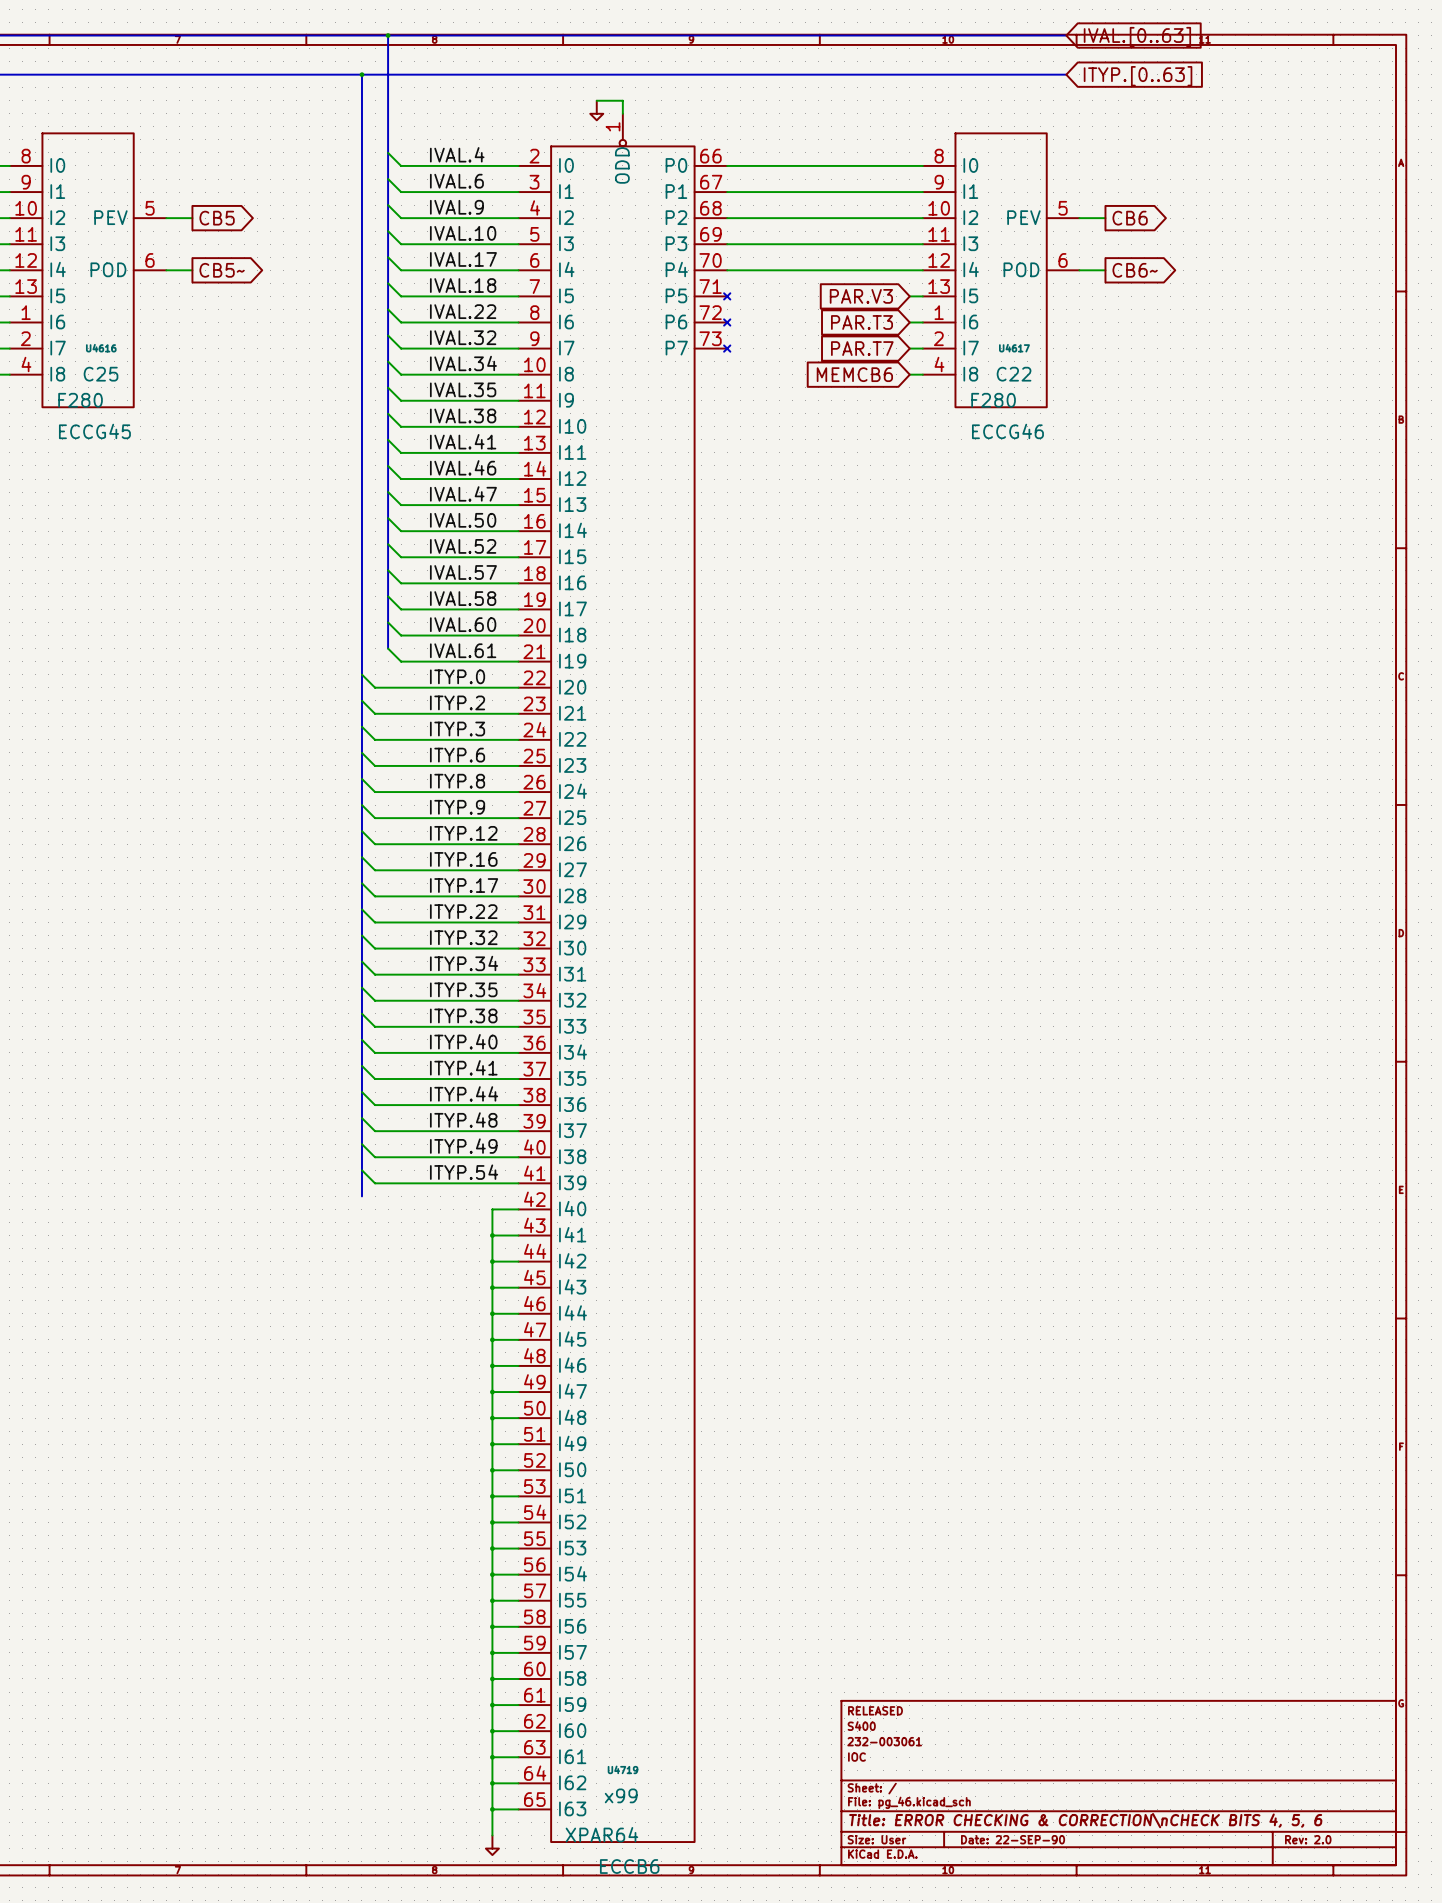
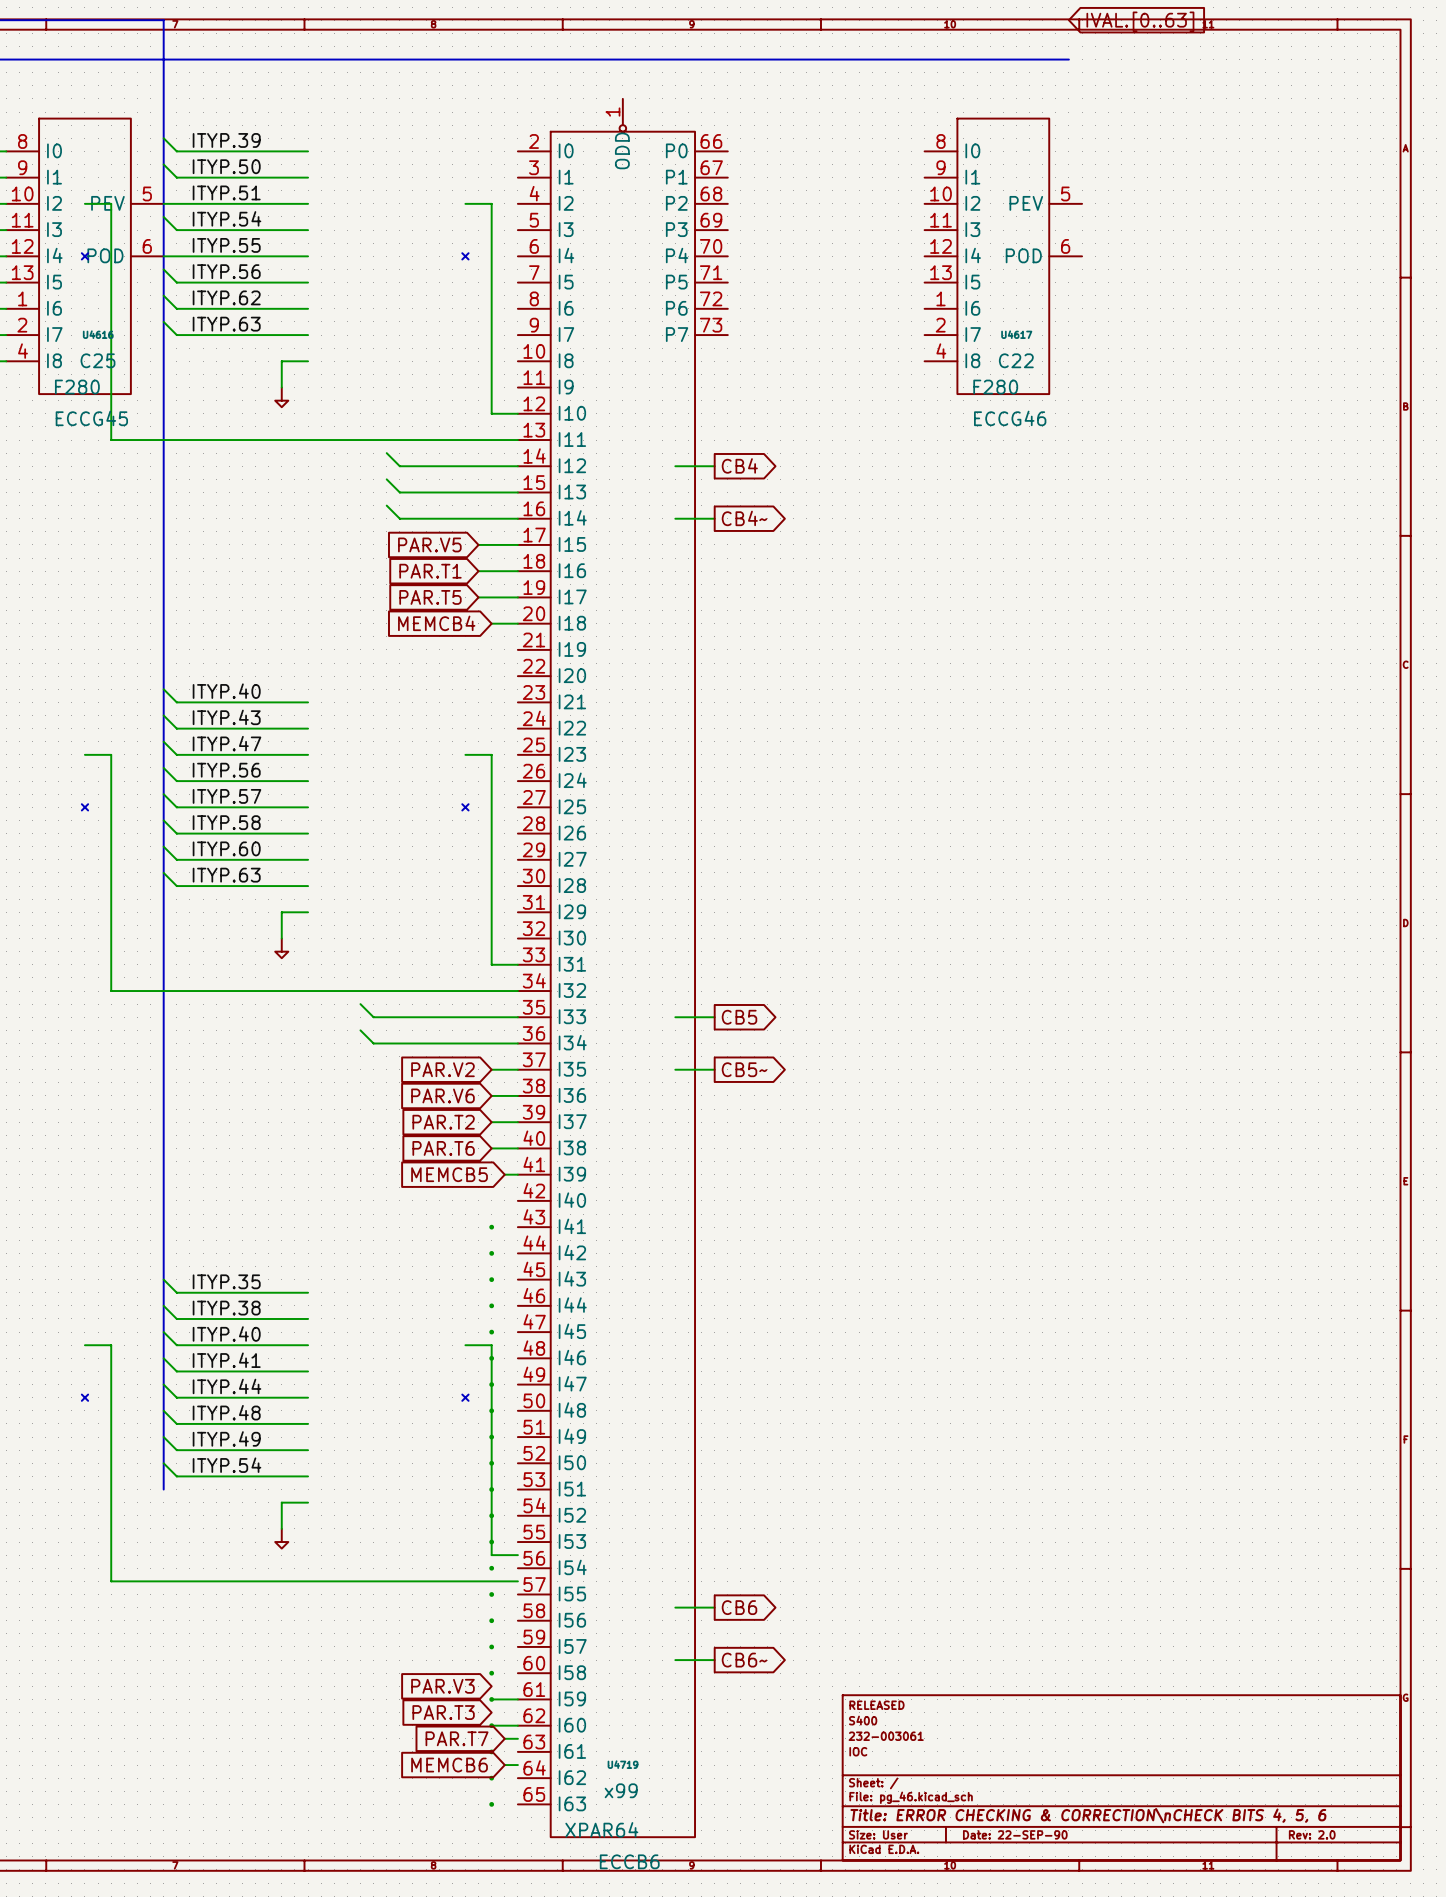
bus: (166, 35) (1066, 35) -> (163, 20) (163, 1489)
bus: (388, 35) (388, 648) -> none
junction: (388, 35) -> none
bus: (361, 74) (361, 1196) -> none
junction: (361, 74) -> none
global label: ITYP.[0..63] (1138, 76) -> none
wire: (596, 100) (622, 100) (622, 113) -> none
power symbol: (596, 110) -> none
wire: none -> (163, 138) (176, 151) (308, 151)
wire: (388, 152) (401, 165) (518, 165) -> none
label: IVAL.4 (457, 154) -> none
label: none -> ITYP.39 (226, 140)
wire: (727, 165) (922, 165) -> none
wire: none -> (163, 164) (176, 177) (308, 177)
wire: (388, 179) (401, 192) (518, 192) -> none
label: none -> ITYP.50 (226, 166)
label: IVAL.6 (456, 181) -> none
wire: (727, 192) (922, 192) -> none
wire: (388, 205) (401, 218) (466, 218) -> none
label: none -> ITYP.51 (226, 192)
label: IVAL.9 (456, 207) -> none
wire: none -> (189, 203) (308, 203)
global label: CB5 (217, 218) -> none
wire: (492, 218) (518, 218) -> (491, 203) (491, 413)
wire: (727, 218) (922, 218) -> none
wire: (1079, 218) (1105, 218) -> none
global label: CB6 (1130, 218) -> none
wire: none -> (163, 216) (176, 230) (308, 230)
wire: (388, 231) (401, 244) (518, 244) -> none
label: none -> ITYP.54 (226, 218)
label: IVAL.10 (463, 233) -> none
wire: (727, 244) (922, 244) -> none
wire: (388, 257) (401, 270) (518, 270) -> none
label: none -> ITYP.55 (226, 245)
label: IVAL.17 (463, 259) -> none
no-connect mark: none -> (84, 256)
wire: none -> (189, 256) (308, 256)
global label: CB5~ (222, 270) -> none
no-connect mark: none -> (465, 256)
wire: (727, 270) (922, 270) -> none
wire: (1079, 270) (1105, 270) -> none
global label: CB6~ (1135, 270) -> none
wire: none -> (163, 269) (176, 282) (308, 282)
wire: (388, 283) (401, 296) (518, 296) -> none
label: none -> ITYP.56 (226, 271)
label: IVAL.18 (463, 285) -> none
no-connect mark: (727, 296) -> none
global label: PAR.V3 (861, 296) -> none
wire: (909, 296) (922, 296) -> none
wire: none -> (163, 295) (176, 308) (308, 308)
wire: (388, 309) (401, 322) (518, 322) -> none
label: none -> ITYP.62 (226, 297)
label: IVAL.22 (463, 311) -> none
no-connect mark: (727, 322) -> none
global label: PAR.T3 (862, 322) -> none
wire: (909, 322) (922, 322) -> none
wire: none -> (163, 321) (176, 335) (308, 335)
wire: (388, 335) (401, 348) (518, 348) -> none
label: none -> ITYP.63 (226, 324)
label: IVAL.32 (463, 337) -> none
no-connect mark: (727, 348) -> none
global label: PAR.T7 (862, 348) -> none
wire: (909, 348) (922, 348) -> none
wire: (388, 361) (401, 374) (518, 374) -> none
label: IVAL.34 (463, 363) -> none
wire: none -> (308, 361) (281, 361) (281, 387)
global label: MEMCB6 (854, 374) -> none
wire: (909, 374) (922, 374) -> none
wire: (388, 387) (401, 400) (518, 400) -> none
label: IVAL.35 (463, 389) -> none
power symbol: none -> (281, 397)
wire: (388, 413) (401, 426) (492, 426) -> none
label: IVAL.38 (463, 415) -> none
wire: (388, 439) (401, 452) -> (84, 203) (111, 203) (111, 440) (399, 440)
label: IVAL.41 (463, 441) -> none
label: IVAL.46 (463, 467) -> none
global label: none -> CB4 (739, 465)
wire: none -> (675, 466) (714, 466)
label: IVAL.47 (463, 493) -> none
label: IVAL.50 (463, 520) -> none
global label: none -> CB4~ (744, 518)
wire: none -> (675, 518) (714, 518)
wire: (388, 544) (401, 557) (479, 557) -> none
label: IVAL.52 (463, 546) -> none
global label: none -> PAR.V5 (429, 544)
wire: (388, 570) (401, 583) (479, 583) -> none
label: IVAL.57 (463, 572) -> none
global label: none -> PAR.T1 (430, 571)
wire: (388, 596) (401, 609) (479, 609) -> none
label: IVAL.58 (463, 598) -> none
global label: none -> PAR.T5 (430, 597)
wire: (388, 622) (401, 635) (492, 635) -> none
label: IVAL.60 (463, 624) -> none
global label: none -> MEMCB4 (436, 623)
wire: (388, 648) (401, 661) (518, 661) -> none
label: IVAL.61 (463, 650) -> none
wire: (361, 674) (375, 687) (518, 687) -> none
label: ITYP.0 (457, 676) -> none
wire: none -> (163, 689) (176, 702) (308, 702)
wire: (361, 700) (375, 713) (518, 713) -> none
label: none -> ITYP.40 (226, 691)
label: ITYP.2 (457, 702) -> none
wire: none -> (163, 715) (176, 728) (308, 728)
wire: (361, 726) (375, 739) (518, 739) -> none
label: none -> ITYP.43 (226, 717)
label: ITYP.3 (457, 729) -> none
wire: none -> (163, 741) (176, 754) (308, 754)
wire: (361, 752) (375, 765) (466, 765) -> none
label: none -> ITYP.47 (226, 743)
label: ITYP.6 (457, 755) -> none
wire: (492, 765) (518, 765) -> (491, 754) (491, 964)
wire: none -> (163, 767) (176, 781) (308, 781)
wire: (361, 779) (375, 792) (518, 792) -> none
label: none -> ITYP.56 (226, 770)
label: ITYP.8 (457, 781) -> none
wire: none -> (163, 794) (176, 807) (308, 807)
wire: (361, 805) (375, 818) (518, 818) -> none
label: none -> ITYP.57 (226, 796)
label: ITYP.9 (457, 807) -> none
no-connect mark: none -> (84, 807)
no-connect mark: none -> (465, 807)
wire: none -> (163, 820) (176, 833) (308, 833)
wire: (361, 831) (375, 844) (518, 844) -> none
label: none -> ITYP.58 (226, 822)
label: ITYP.12 (463, 833) -> none
wire: none -> (163, 846) (176, 859) (308, 859)
wire: (361, 857) (375, 870) (518, 870) -> none
label: none -> ITYP.60 (226, 848)
label: ITYP.16 (463, 859) -> none
wire: none -> (163, 872) (176, 886) (308, 886)
wire: (361, 883) (375, 896) (518, 896) -> none
label: none -> ITYP.63 (226, 875)
label: ITYP.17 (464, 885) -> none
wire: (361, 909) (375, 922) (518, 922) -> none
label: ITYP.22 (463, 911) -> none
wire: none -> (308, 912) (281, 912) (281, 938)
wire: (361, 935) (375, 948) (518, 948) -> none
label: ITYP.32 (463, 937) -> none
power symbol: none -> (281, 948)
wire: (361, 961) (375, 974) (492, 974) -> none
label: ITYP.34 (464, 963) -> none
wire: (361, 987) (375, 1000) -> (84, 754) (111, 754) (111, 991) (373, 991)
label: ITYP.35 (463, 989) -> none
label: ITYP.38 (463, 1015) -> none
wire: none -> (675, 1017) (714, 1017)
global label: none -> CB5 (739, 1017)
label: ITYP.40 (463, 1041) -> none
wire: (361, 1065) (375, 1078) (492, 1078) -> none
label: ITYP.41 (463, 1067) -> none
global label: none -> PAR.V2 (442, 1069)
wire: none -> (675, 1069) (714, 1069)
global label: none -> CB5~ (744, 1069)
wire: (361, 1092) (375, 1105) (492, 1105) -> none
label: ITYP.44 (464, 1093) -> none
global label: none -> PAR.V6 (442, 1095)
wire: (361, 1118) (375, 1131) (492, 1131) -> none
label: ITYP.48 (463, 1120) -> none
global label: none -> PAR.T2 (443, 1122)
wire: (361, 1144) (375, 1157) (492, 1157) -> none
label: ITYP.49 (463, 1146) -> none
global label: none -> PAR.T6 (443, 1148)
wire: (361, 1170) (375, 1183) (505, 1183) -> none
label: ITYP.54 (464, 1172) -> none
global label: none -> MEMCB5 (449, 1174)
wire: (518, 1209) (492, 1209) (492, 1352) -> (465, 1345) (491, 1345)
wire: (492, 1235) (518, 1235) -> none
wire: (492, 1261) (518, 1261) -> none
wire: none -> (163, 1279) (176, 1292) (308, 1292)
wire: (492, 1287) (518, 1287) -> none
label: none -> ITYP.35 (226, 1281)
wire: none -> (163, 1305) (176, 1318) (308, 1318)
wire: (492, 1313) (518, 1313) -> none
label: none -> ITYP.38 (226, 1308)
wire: none -> (163, 1332) (176, 1345) (308, 1345)
wire: (492, 1339) (518, 1339) -> none
label: none -> ITYP.40 (226, 1333)
wire: none -> (84, 1345) (111, 1345) (111, 1581) (517, 1581)
wire: none -> (163, 1358) (176, 1371) (308, 1371)
wire: (492, 1365) (518, 1365) -> none
label: none -> ITYP.41 (226, 1360)
wire: none -> (163, 1384) (176, 1397) (308, 1397)
wire: (492, 1392) (518, 1392) -> none
label: none -> ITYP.44 (226, 1386)
no-connect mark: none -> (84, 1397)
no-connect mark: none -> (465, 1397)
wire: none -> (163, 1410) (176, 1423) (308, 1423)
wire: (492, 1418) (518, 1418) -> none
label: none -> ITYP.48 (226, 1412)
wire: none -> (163, 1437) (176, 1450) (308, 1450)
wire: (492, 1444) (518, 1444) -> none
label: none -> ITYP.49 (226, 1438)
wire: none -> (163, 1463) (176, 1476) (308, 1476)
wire: (492, 1470) (518, 1470) -> none
label: none -> ITYP.54 (226, 1465)
wire: (492, 1496) (518, 1496) -> none
wire: none -> (308, 1502) (281, 1502) (281, 1528)
wire: (492, 1522) (518, 1522) -> none
power symbol: none -> (281, 1538)
wire: (492, 1548) (518, 1548) -> none
wire: (492, 1561) (492, 1835) -> (491, 1555) (517, 1555)
wire: (492, 1574) (518, 1574) -> none
wire: (492, 1600) (518, 1600) -> none
wire: none -> (675, 1607) (714, 1607)
global label: none -> CB6 (739, 1607)
wire: (492, 1626) (518, 1626) -> none
wire: (492, 1652) (518, 1652) -> none
wire: none -> (675, 1660) (714, 1660)
global label: none -> CB6~ (744, 1660)
wire: (492, 1678) (518, 1678) -> none
global label: none -> PAR.V3 (442, 1686)
global label: none -> PAR.T3 (443, 1712)
global label: none -> PAR.T7 (457, 1738)
wire: none -> (504, 1738) (517, 1738)
wire: (492, 1757) (518, 1757) -> none
global label: none -> MEMCB6 (449, 1765)
wire: none -> (504, 1765) (517, 1765)
wire: (492, 1783) (518, 1783) -> none
wire: (492, 1809) (518, 1809) -> none
power symbol: (492, 1845) -> none

